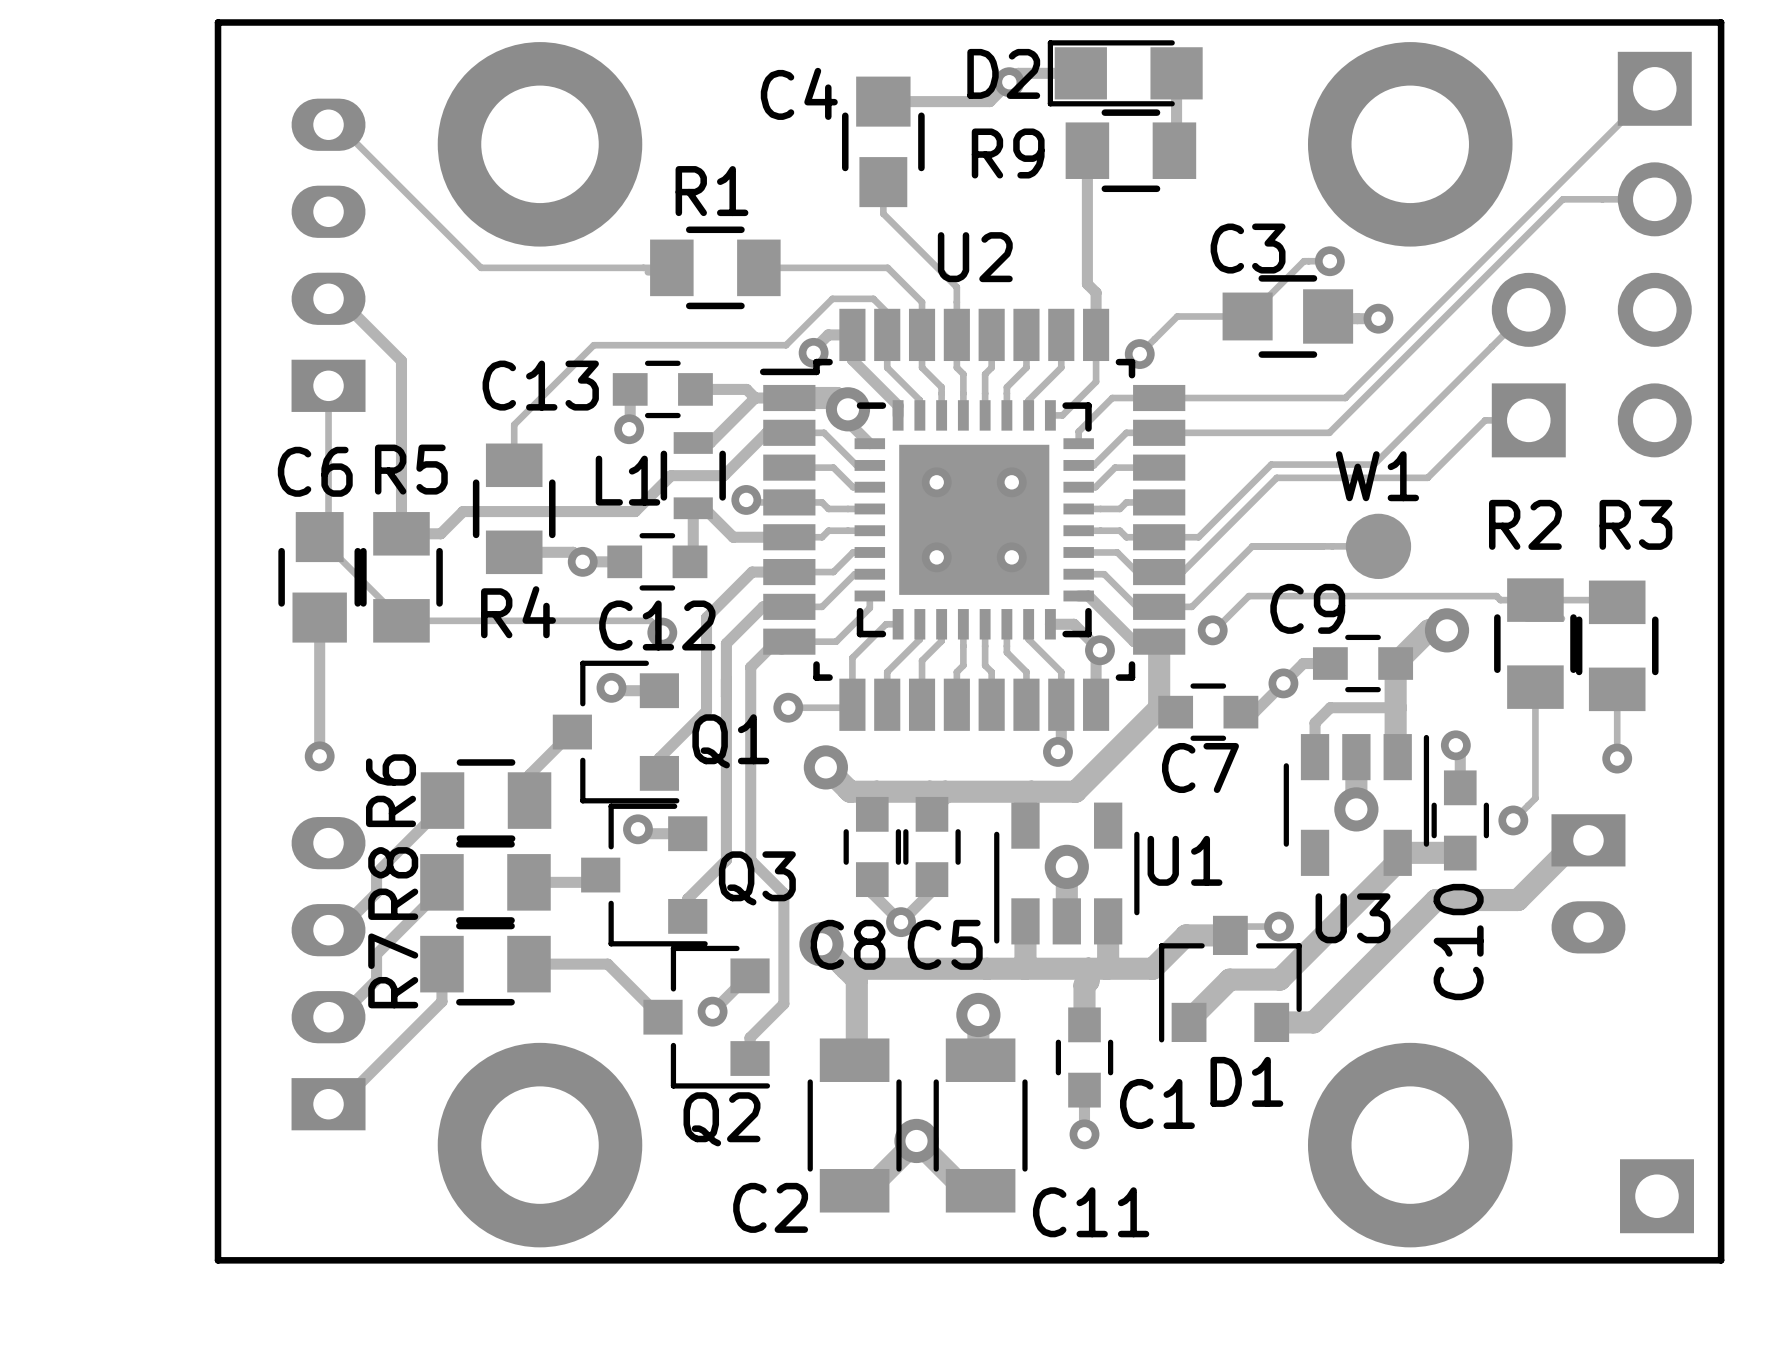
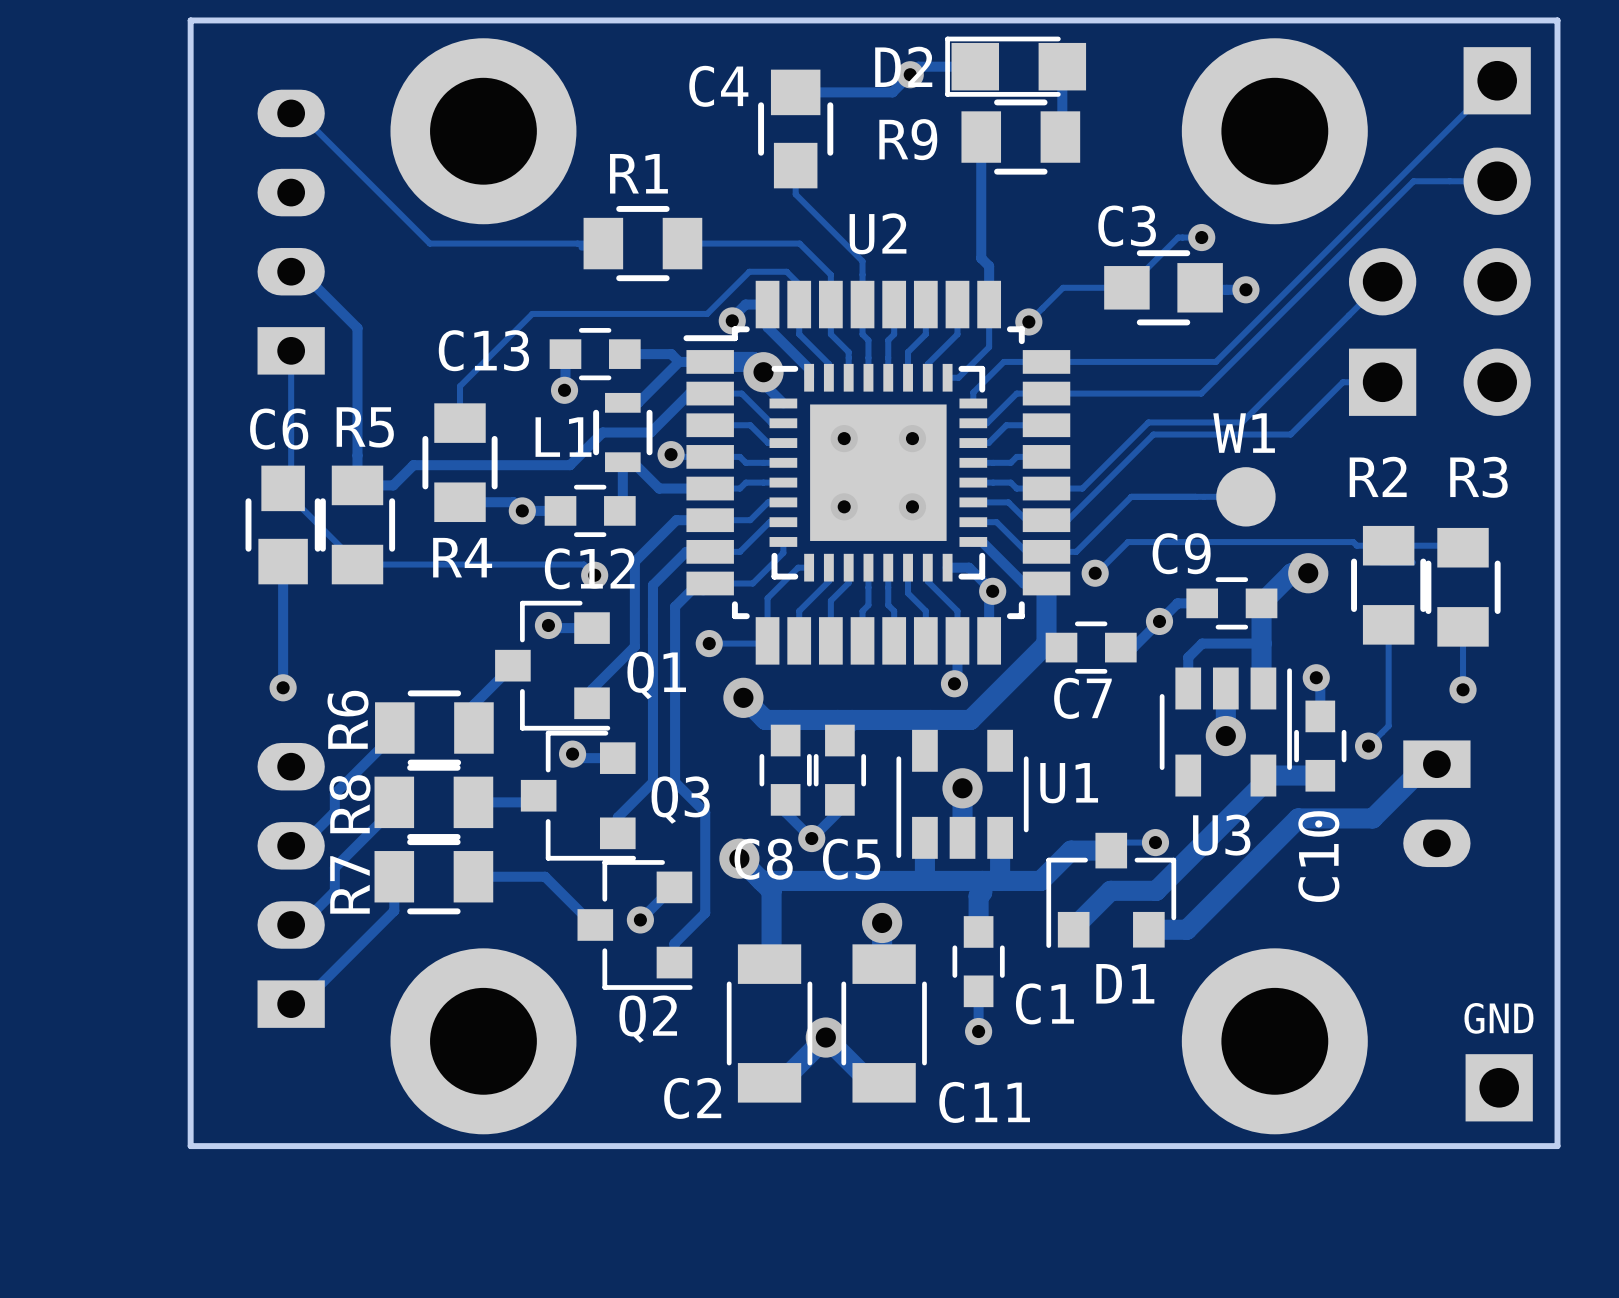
text: none -> GND (1498, 1018)

